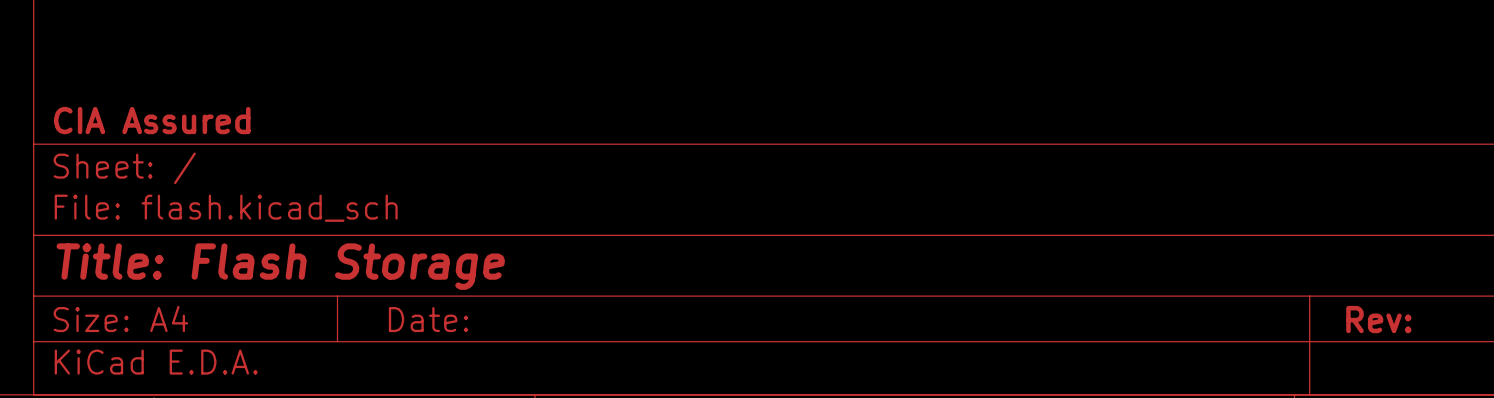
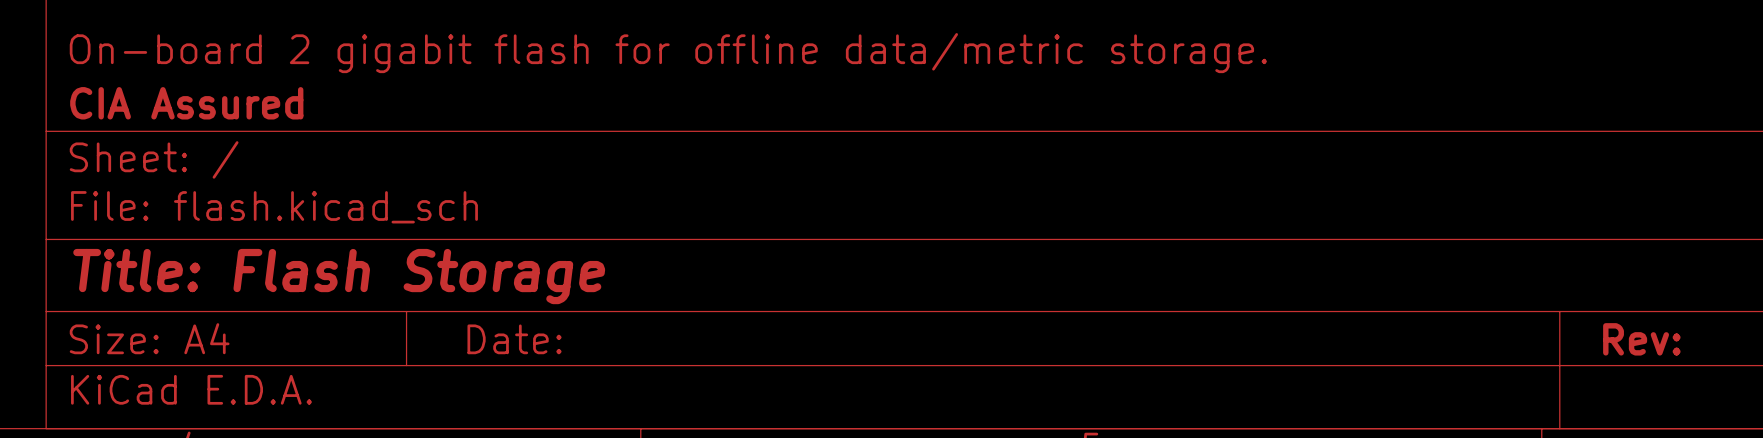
title block: none -> On-board 2 gigabit flash for offline data/metric storage. (668, 53)

